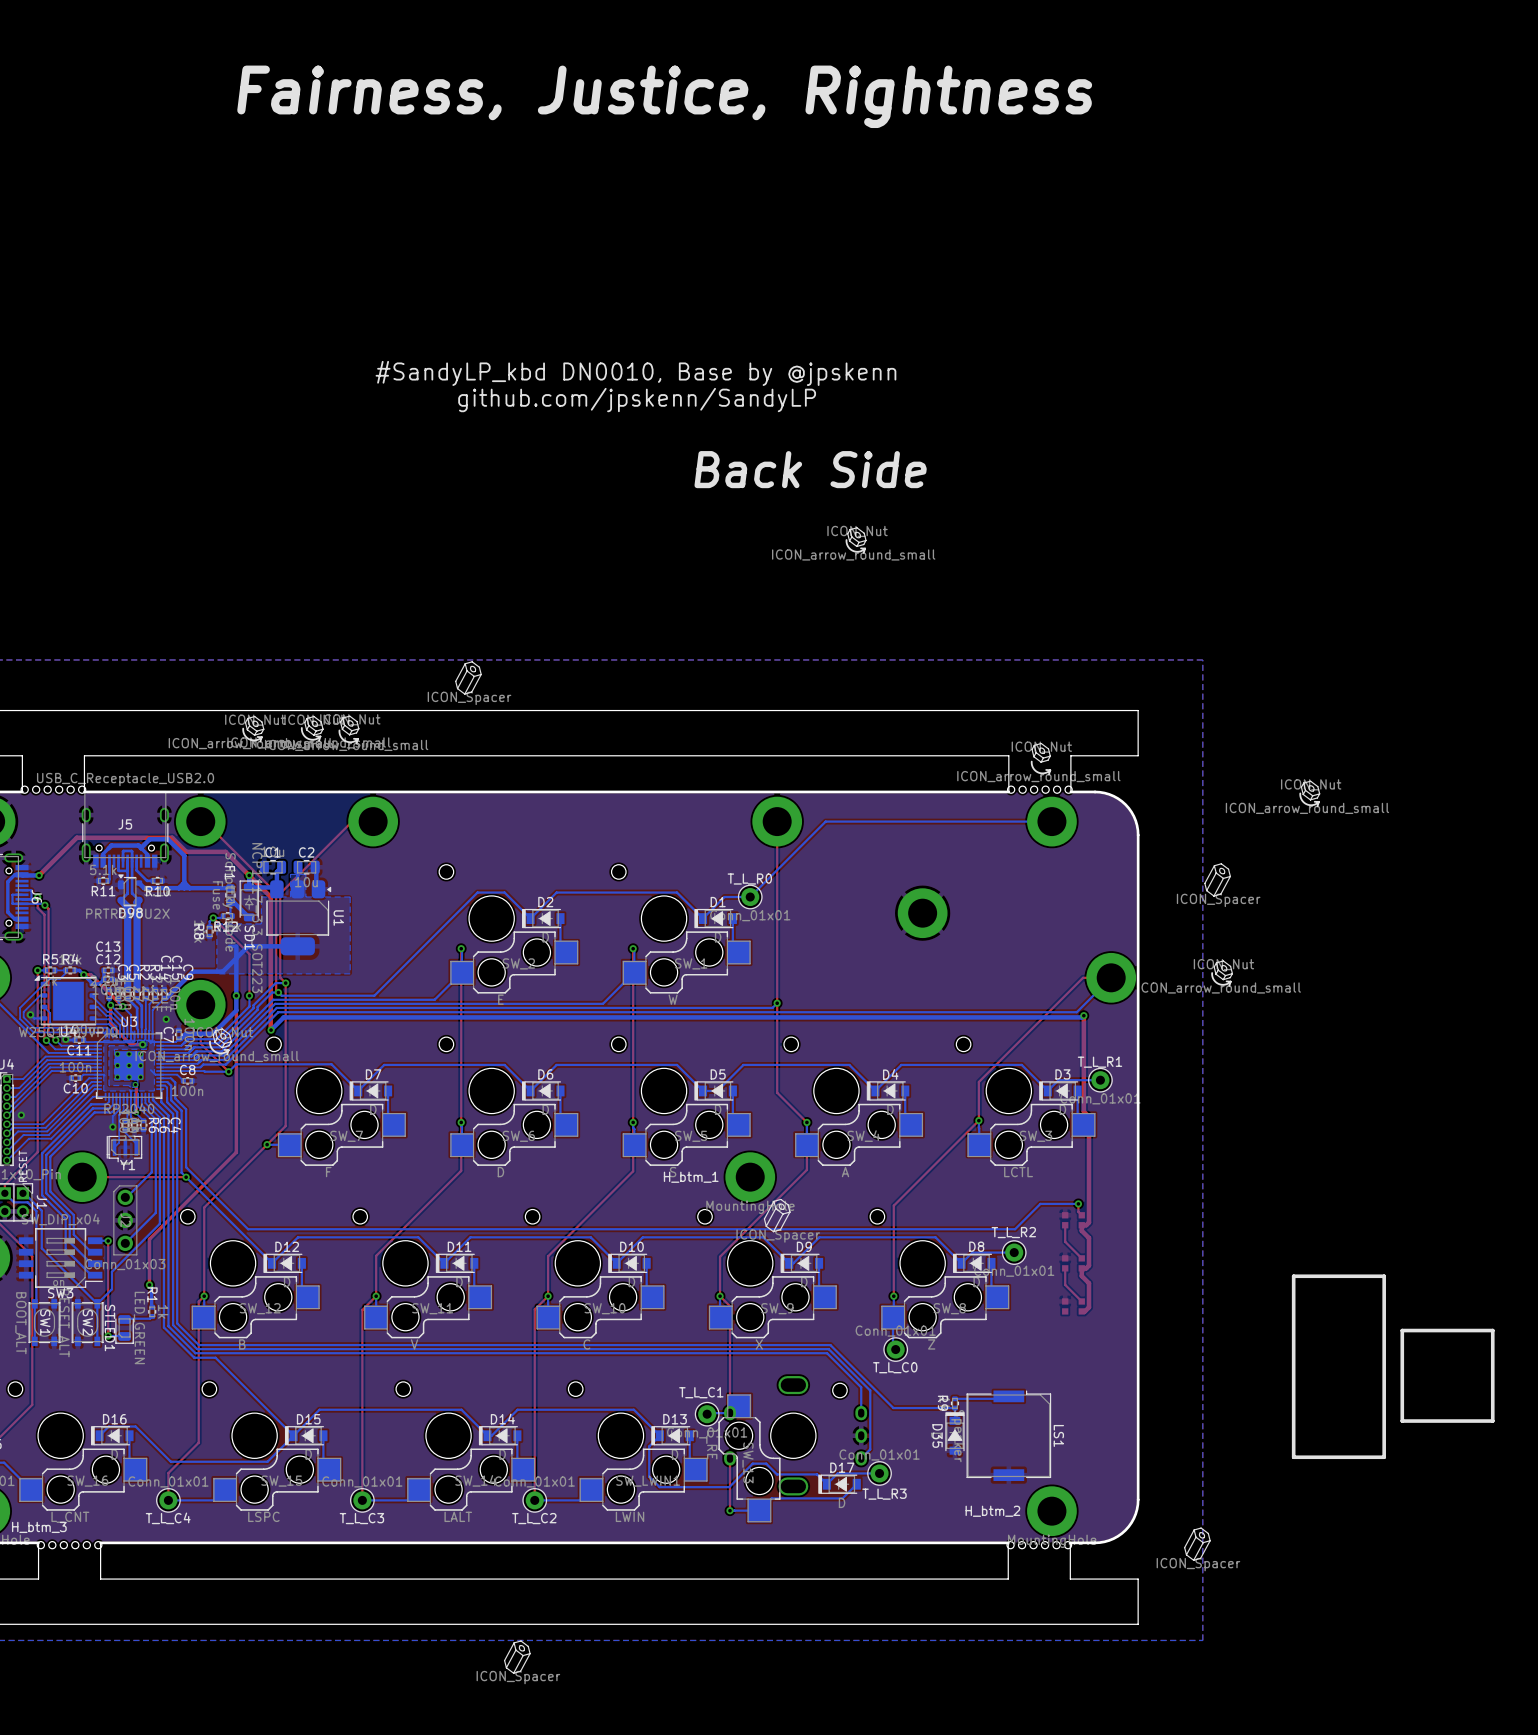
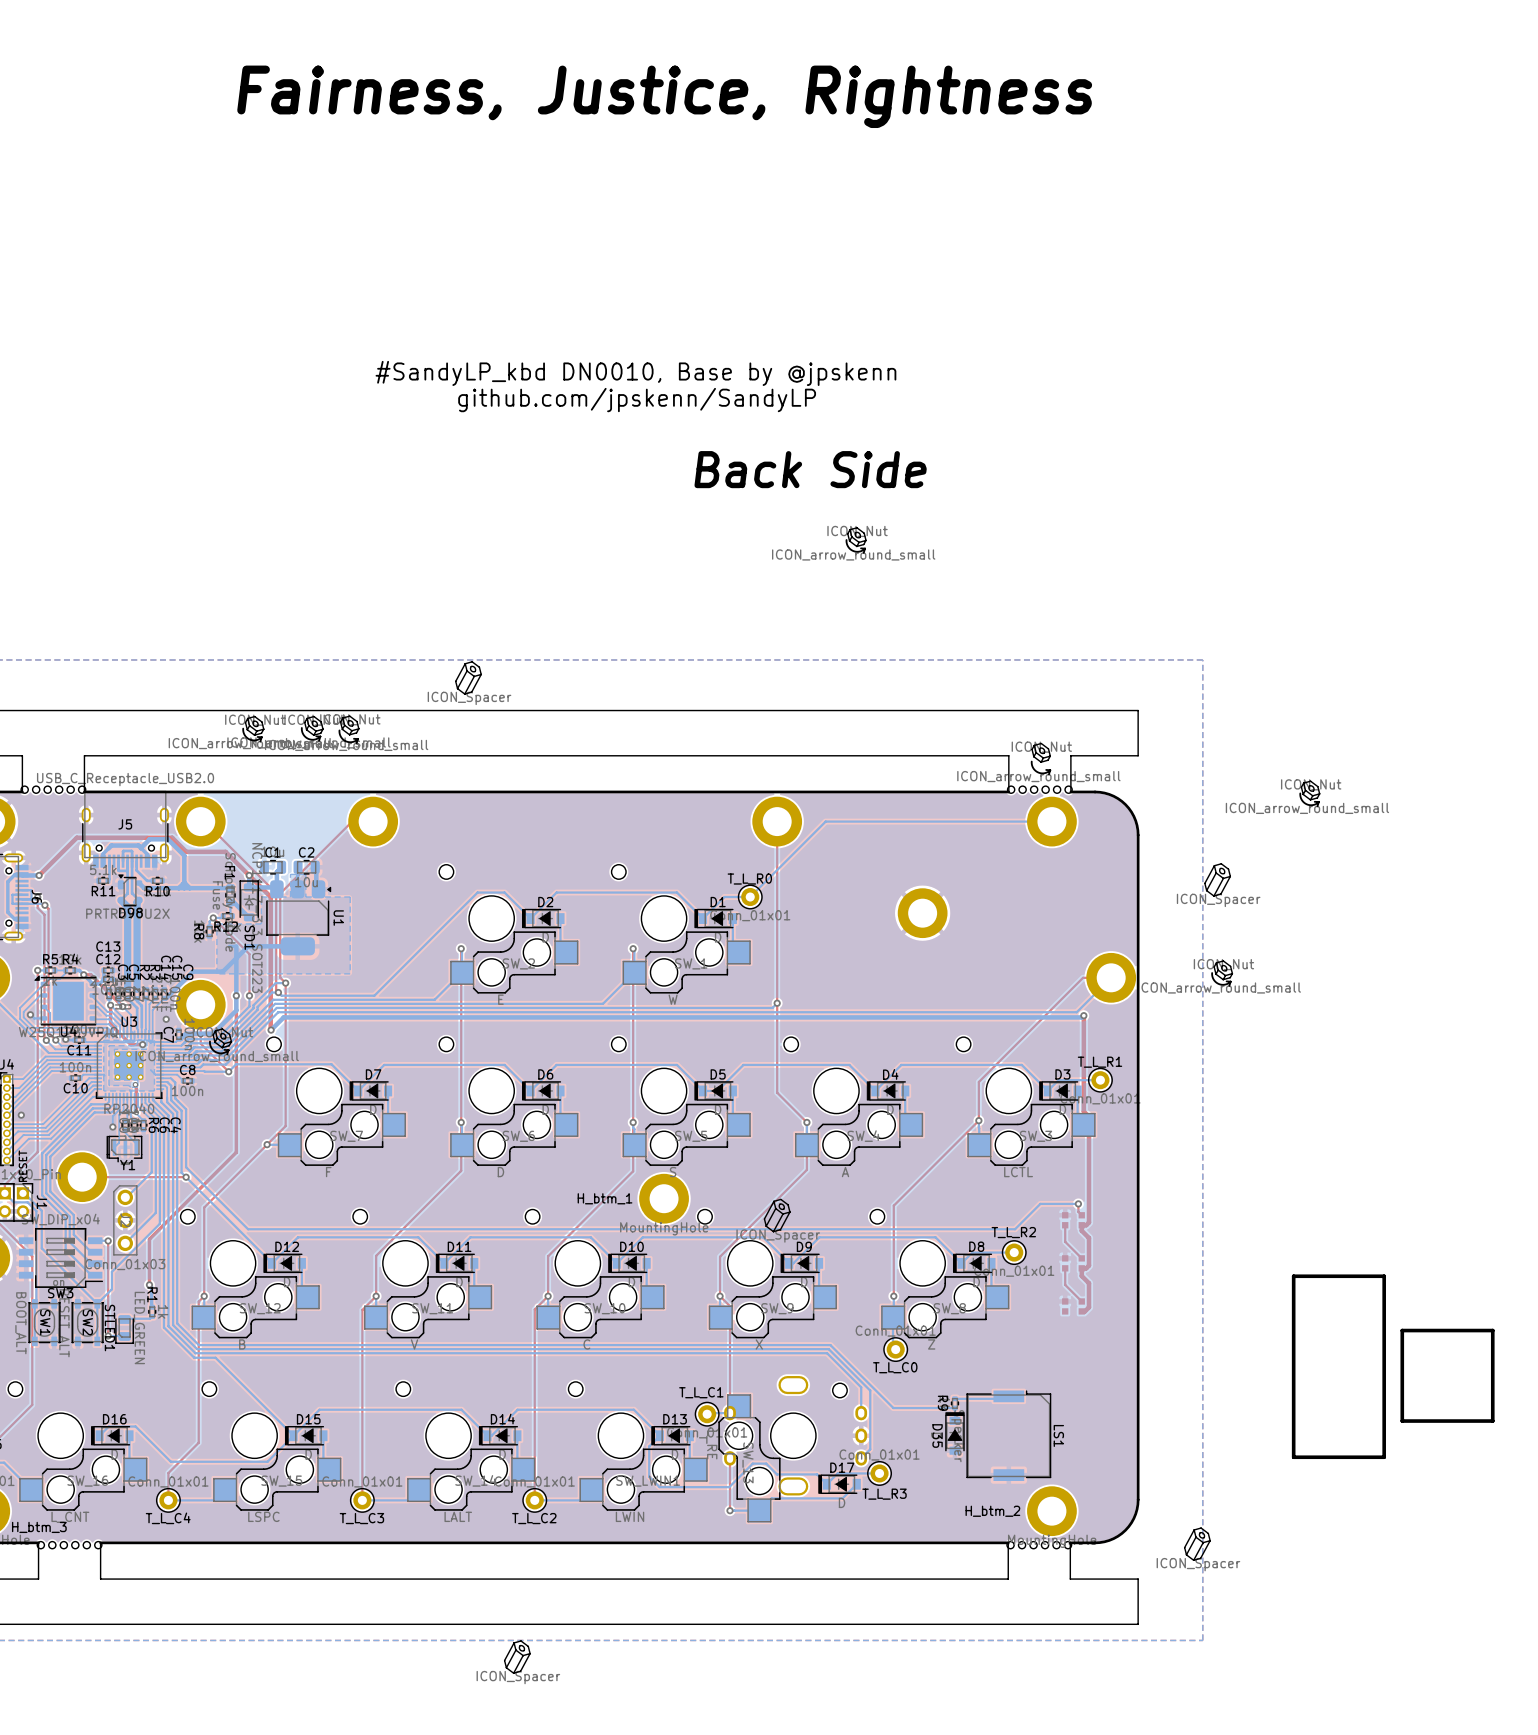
H_btm_1 position: (750, 1177) -> (664, 1198)

